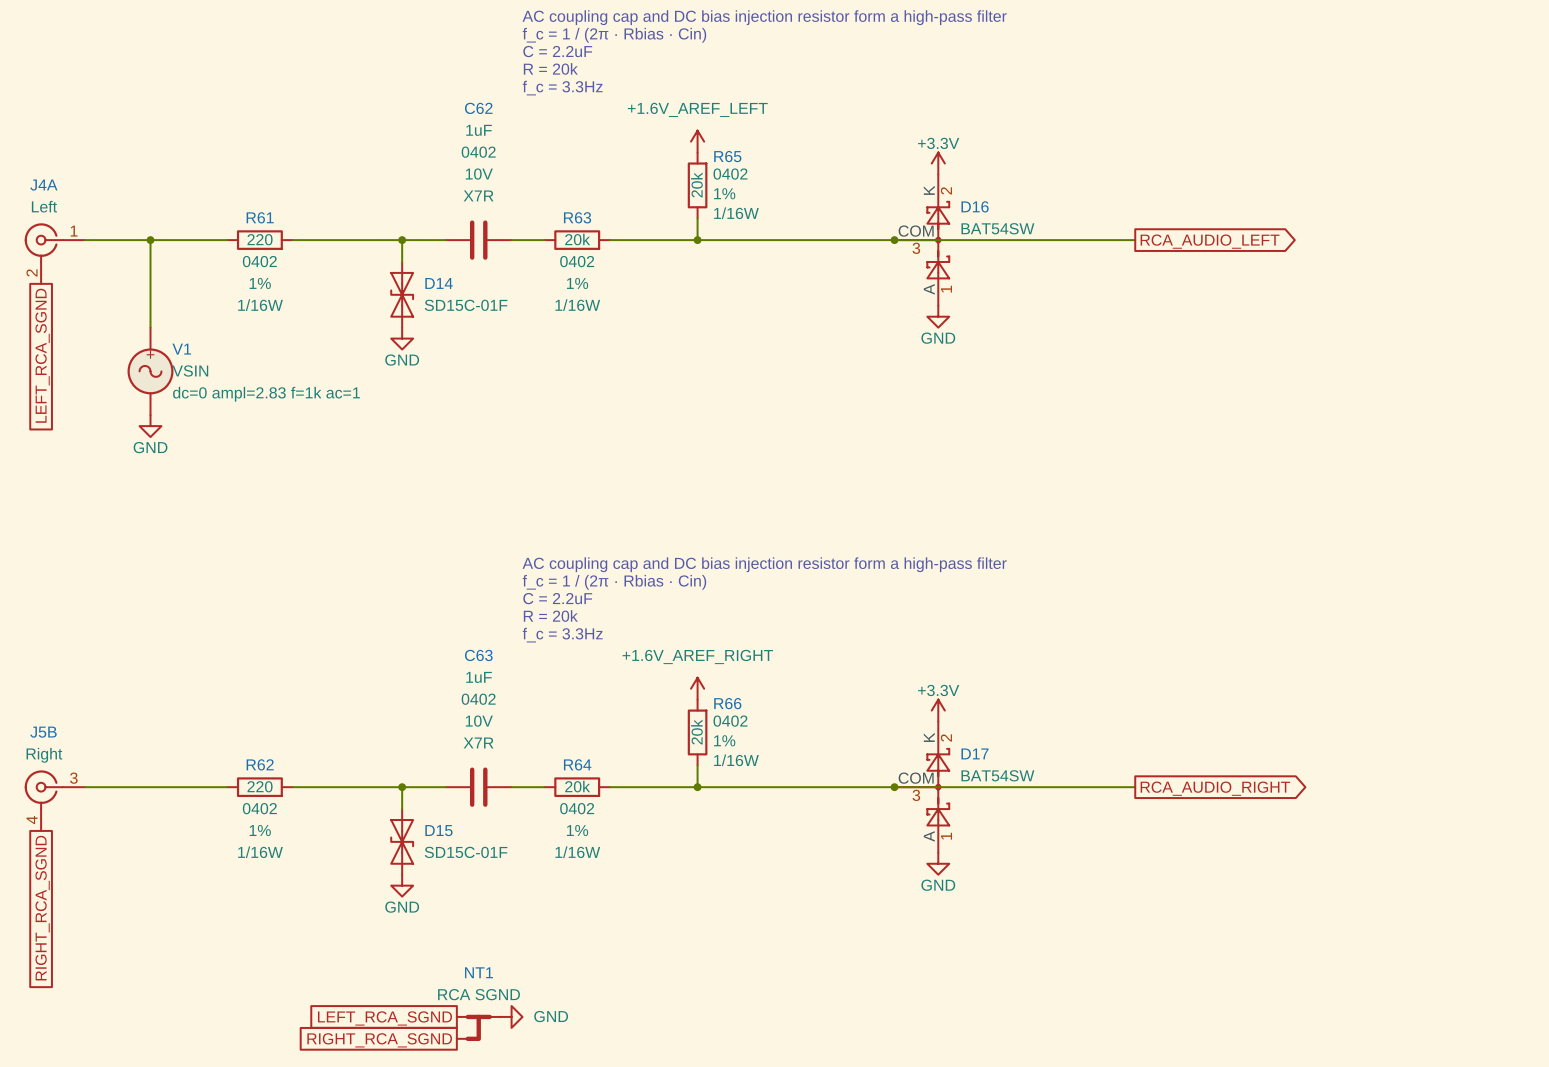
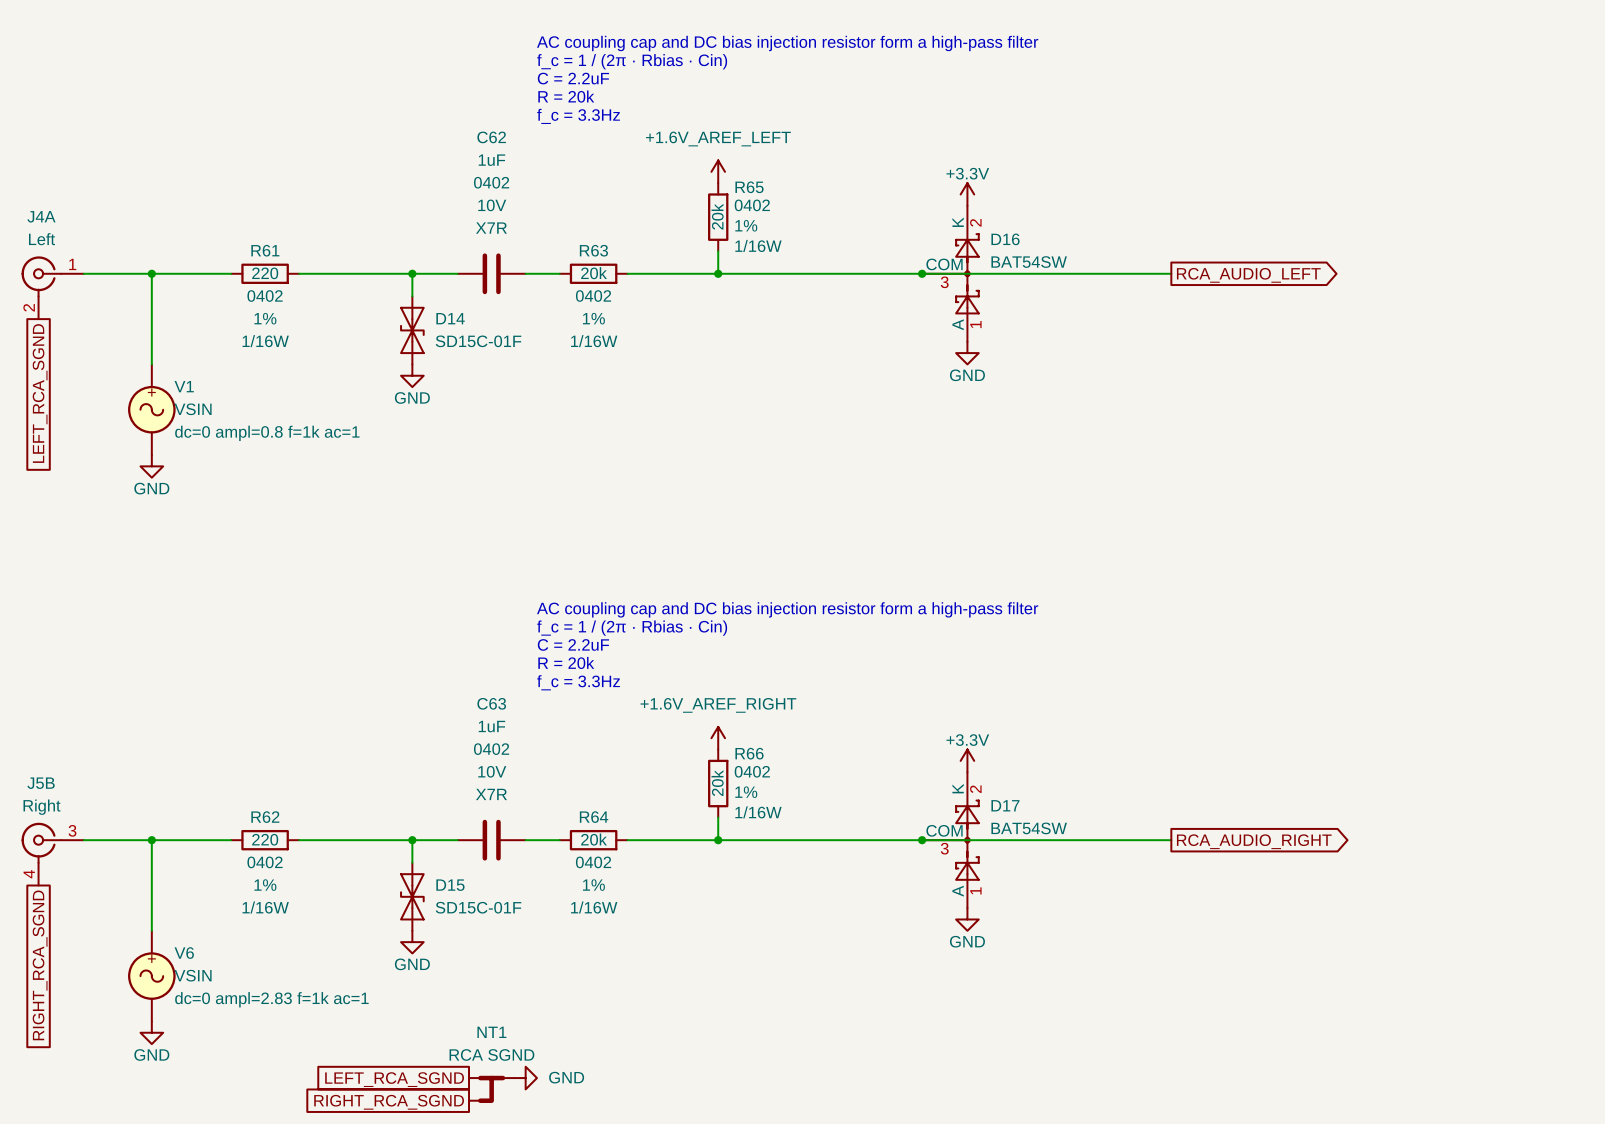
V1 text: dc=0 ampl=2.83 f=1k ac=1 (266, 394) -> dc=0 ampl=0.8 f=1k ac=1 (267, 433)
wire: none -> (151, 840) (151, 930)
junction: none -> (151, 840)
V6: none -> VSIN (151, 976)
power symbol: none -> GND (151, 1032)

